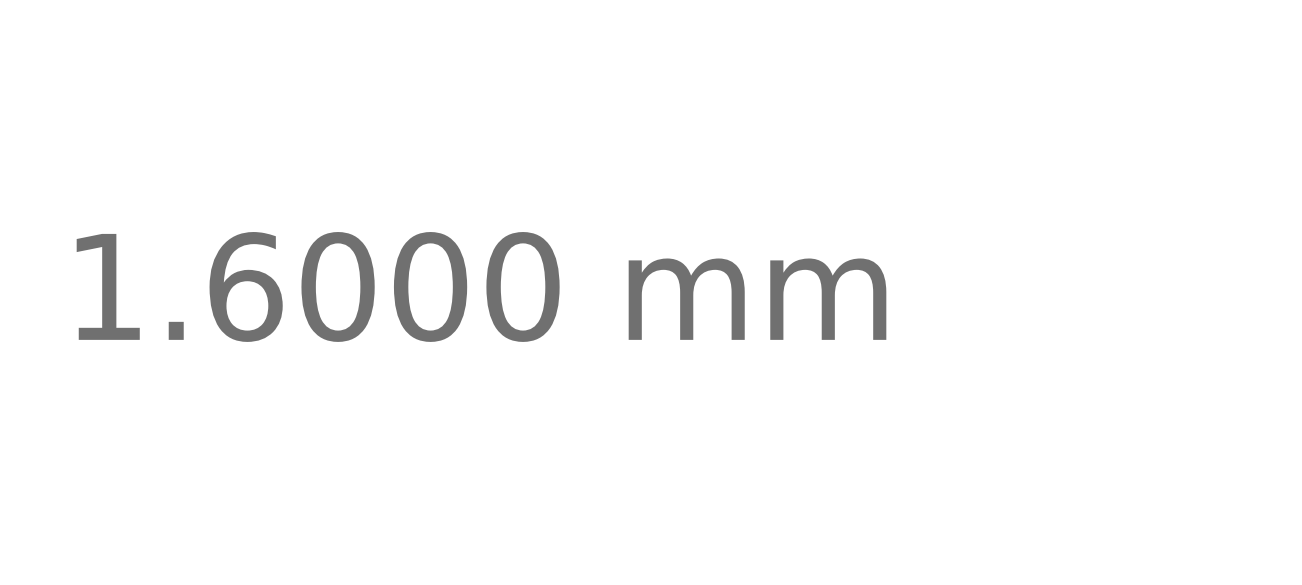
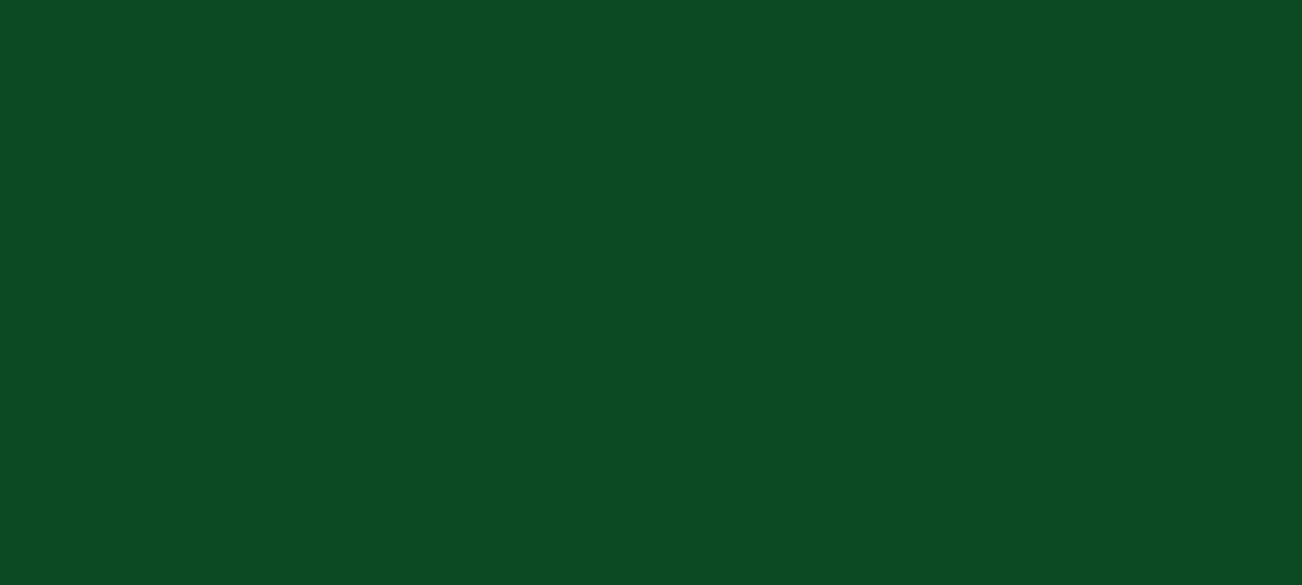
text: 1.6000 mm (481, 286) -> none

